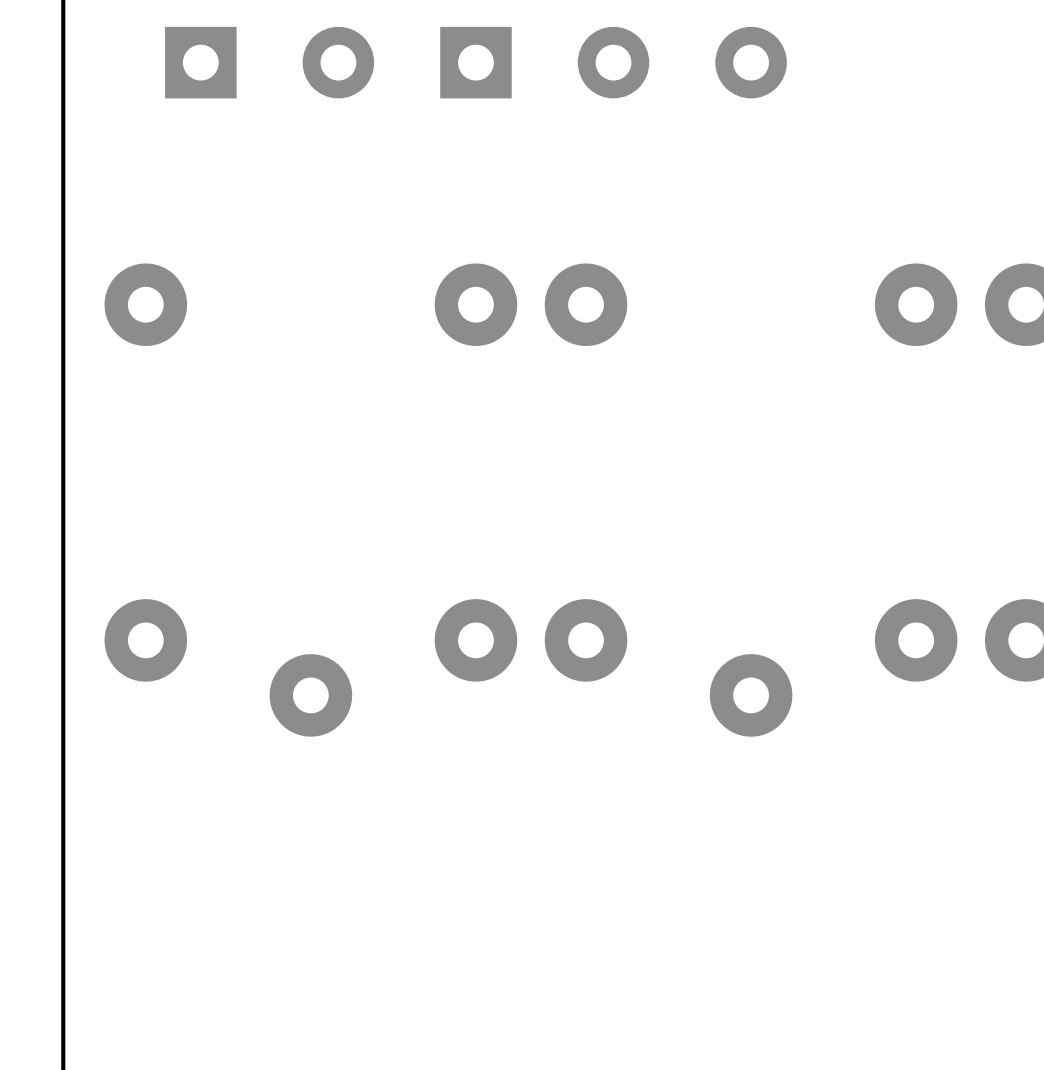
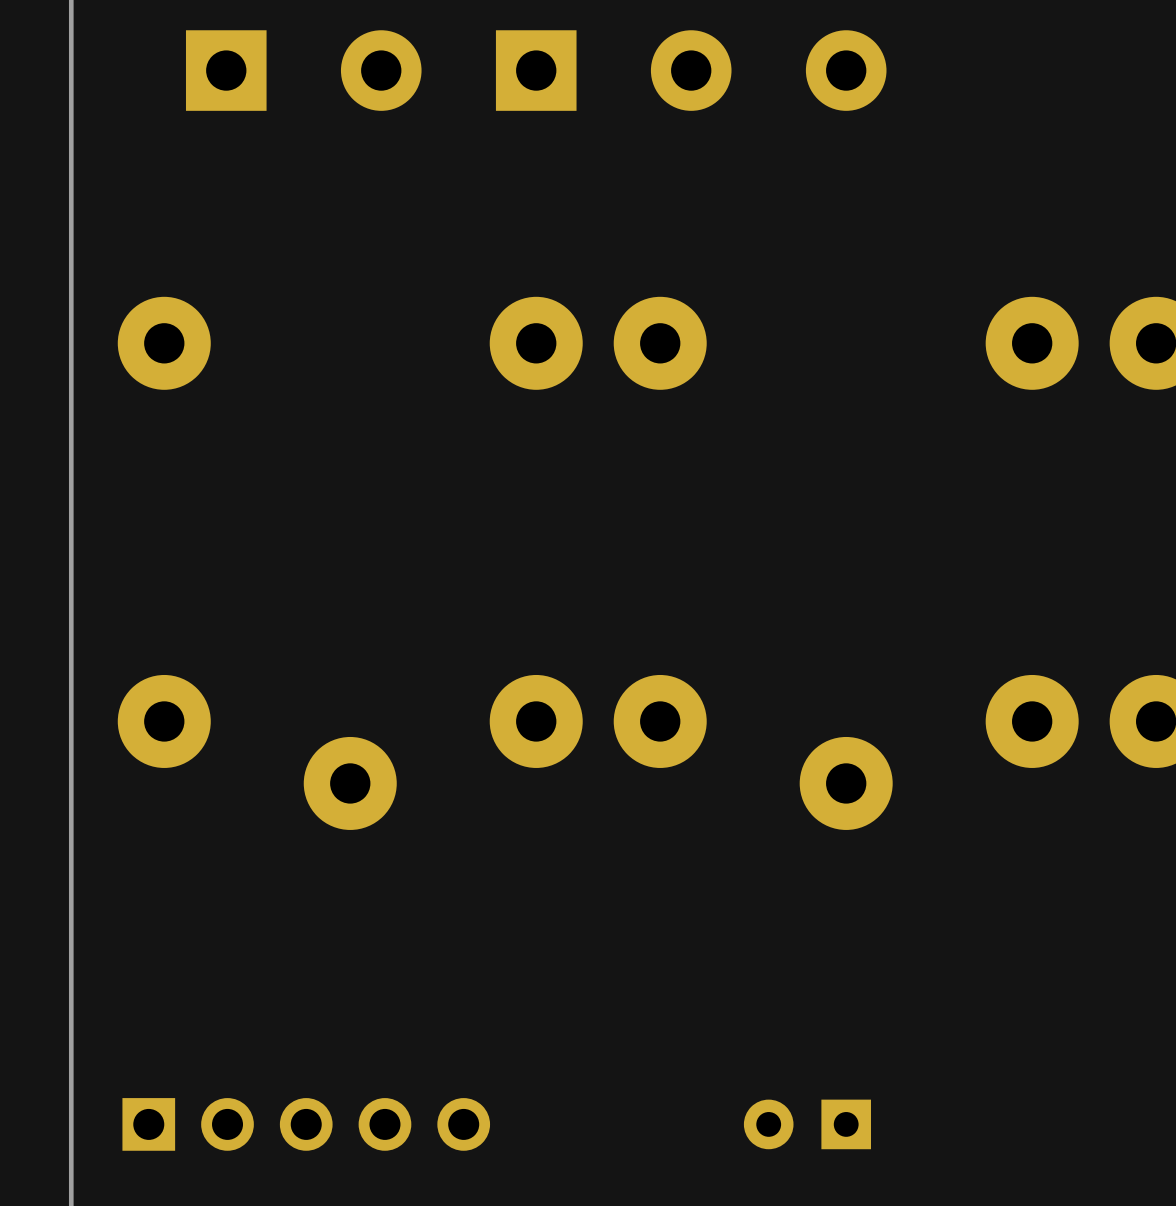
part: none -> (306, 1124)
part: none -> (807, 1124)

